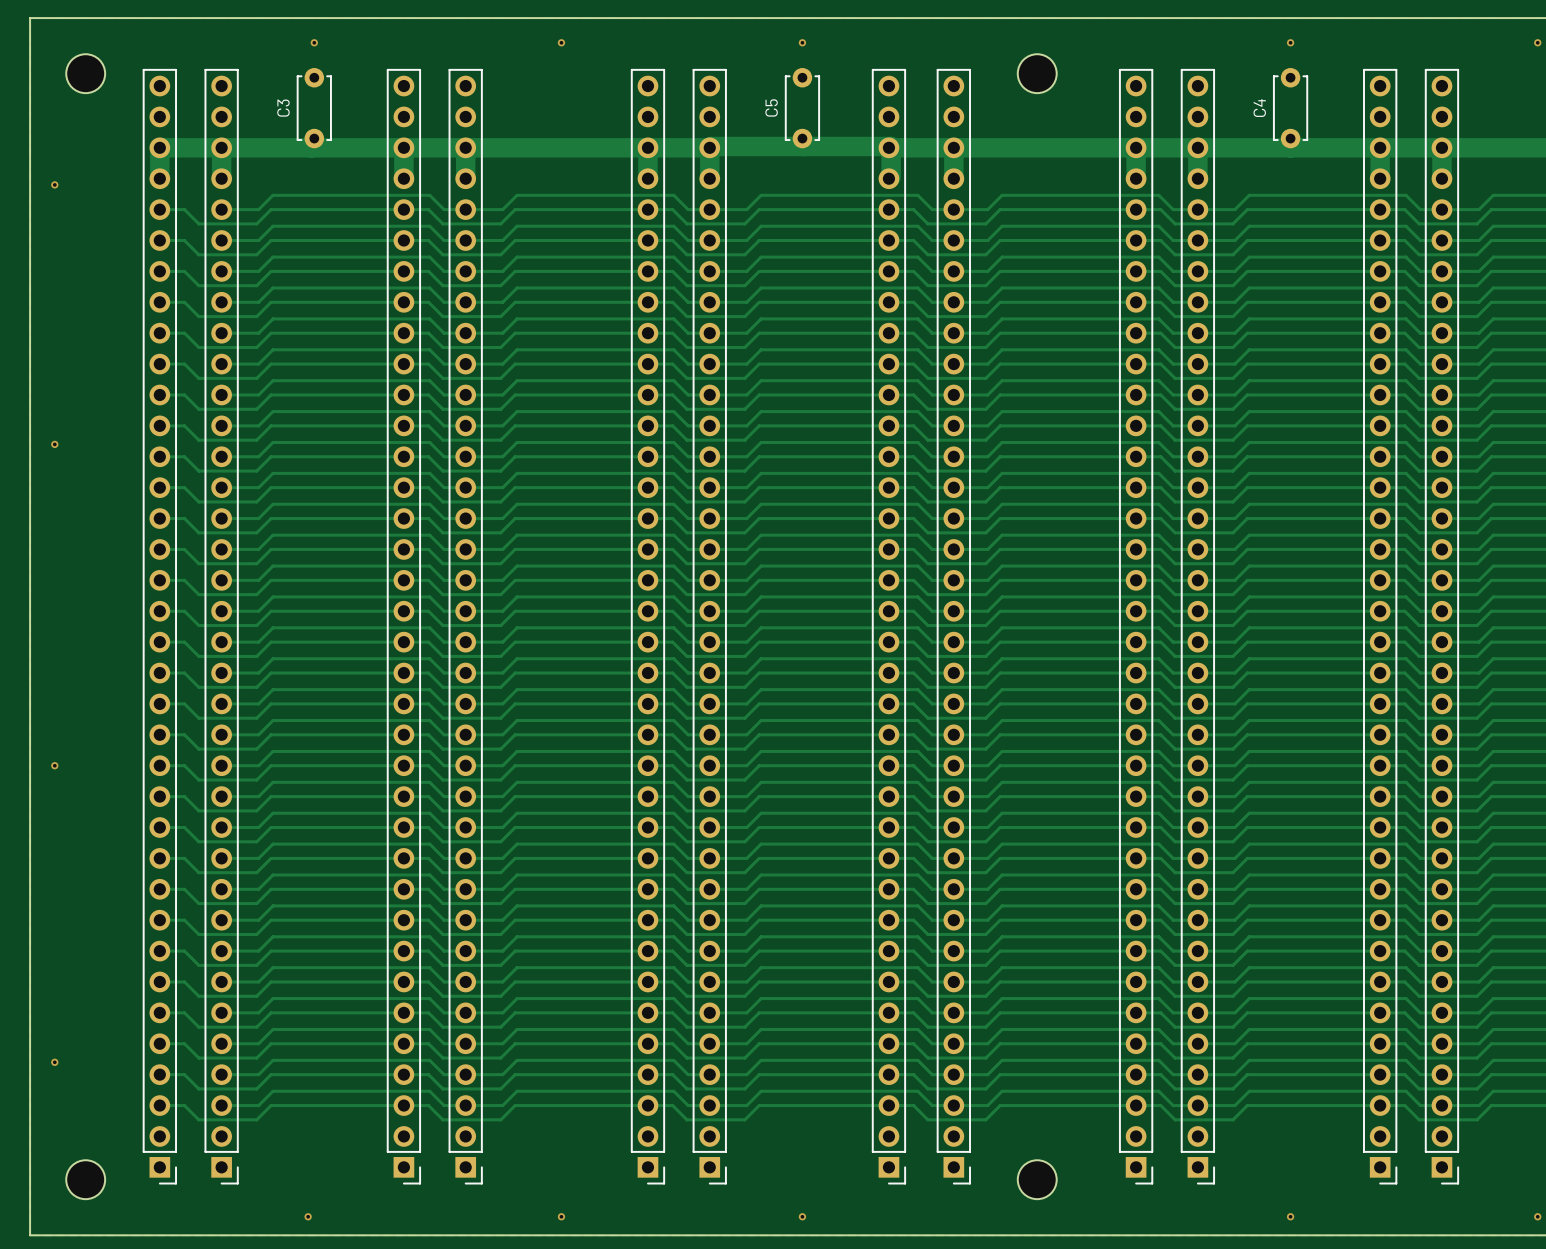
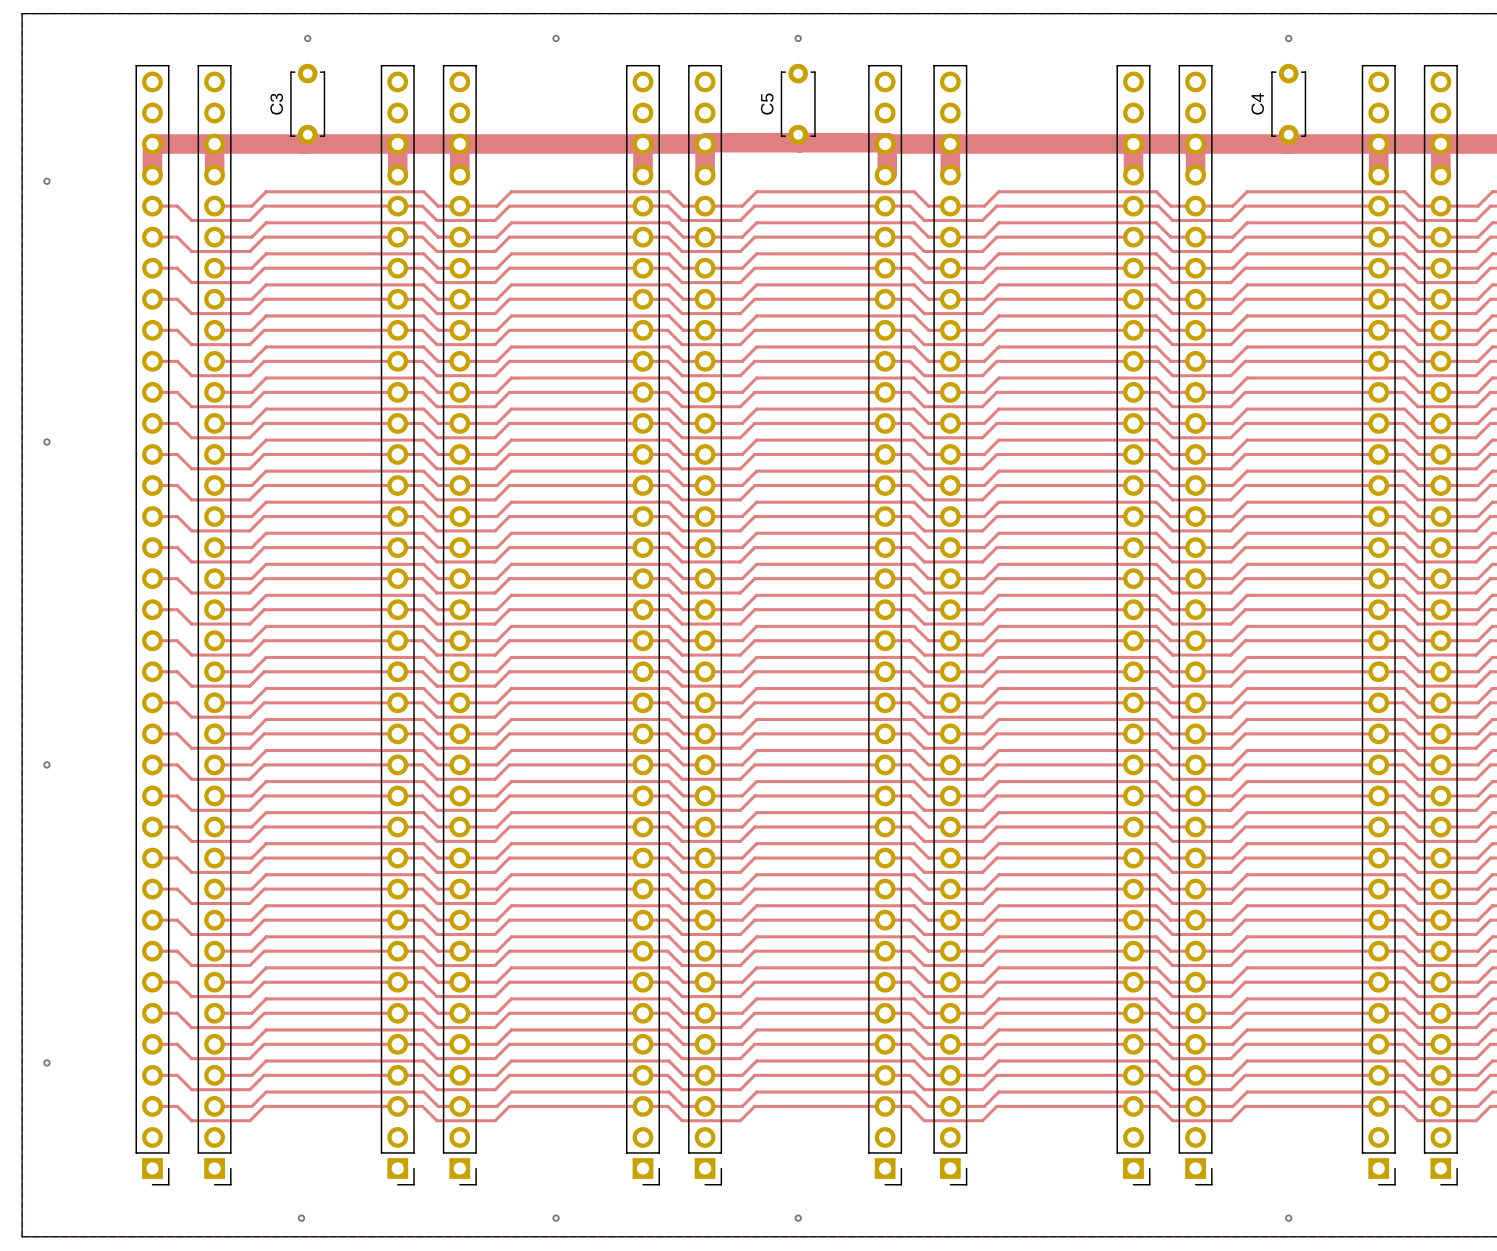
part: (85, 73) -> none
part: (1037, 73) -> none
part: (85, 1179) -> none
part: (1037, 1179) -> none

